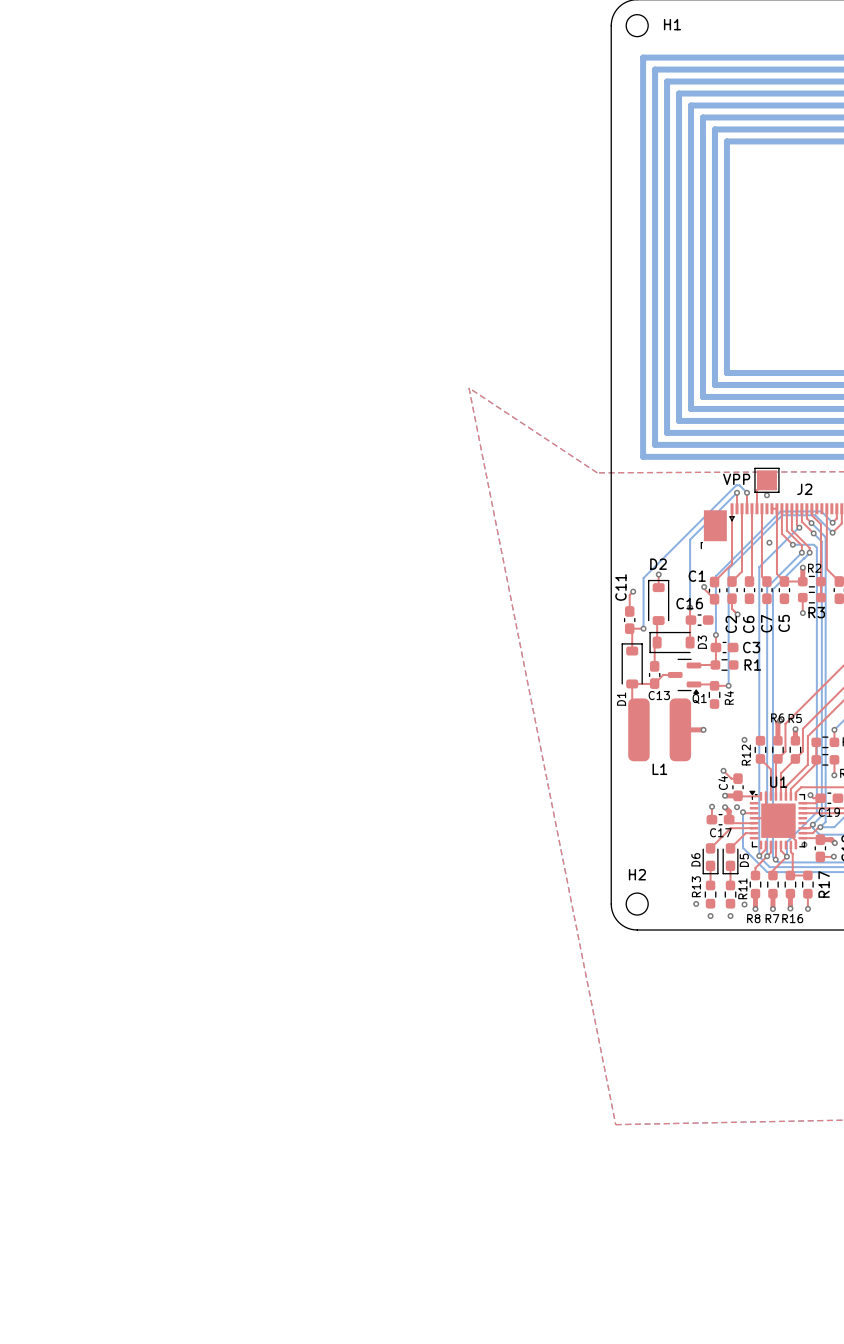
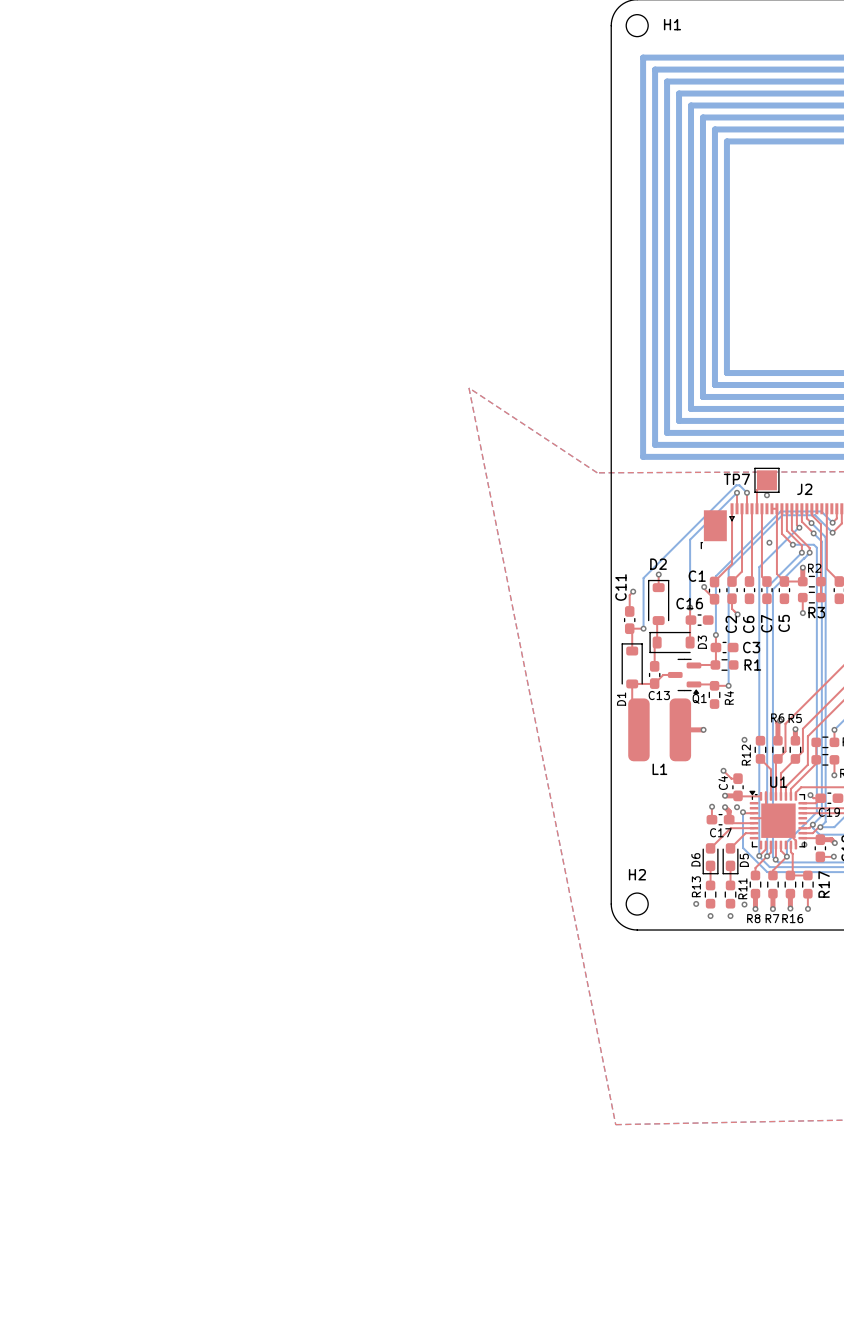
VPP name: VPP (736, 479) -> TP7 (736, 479)

